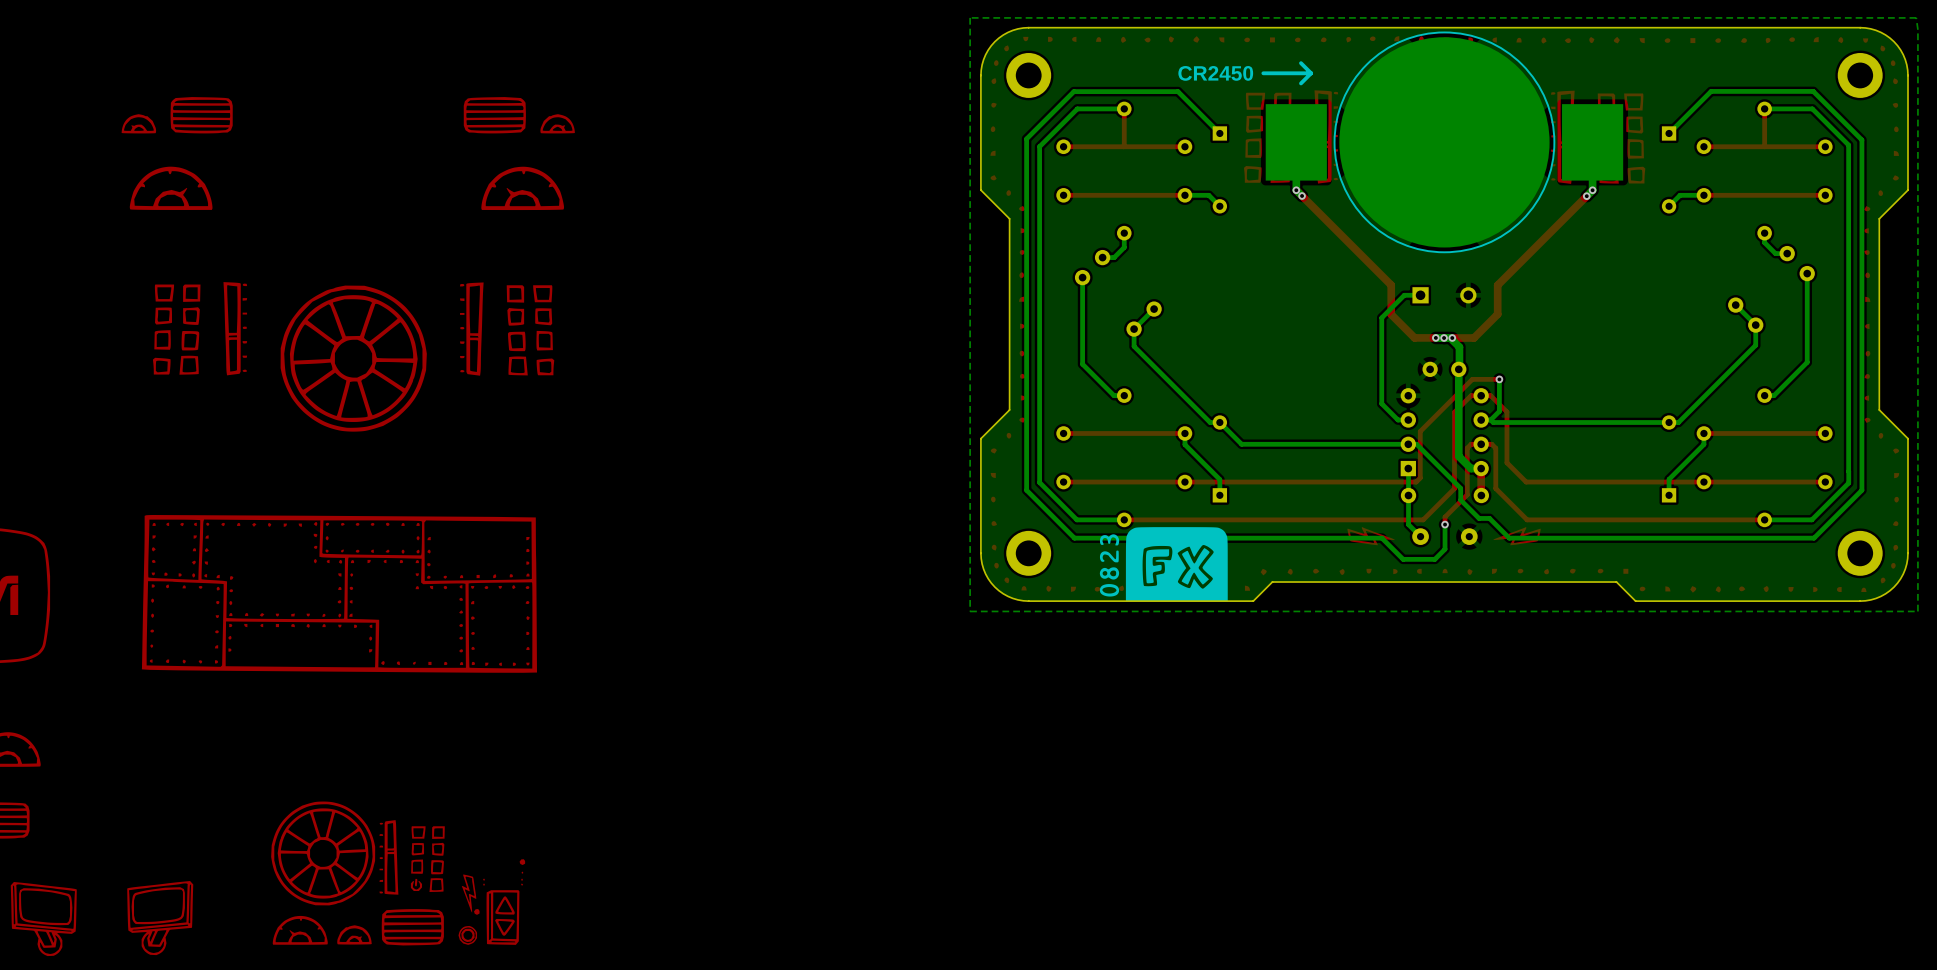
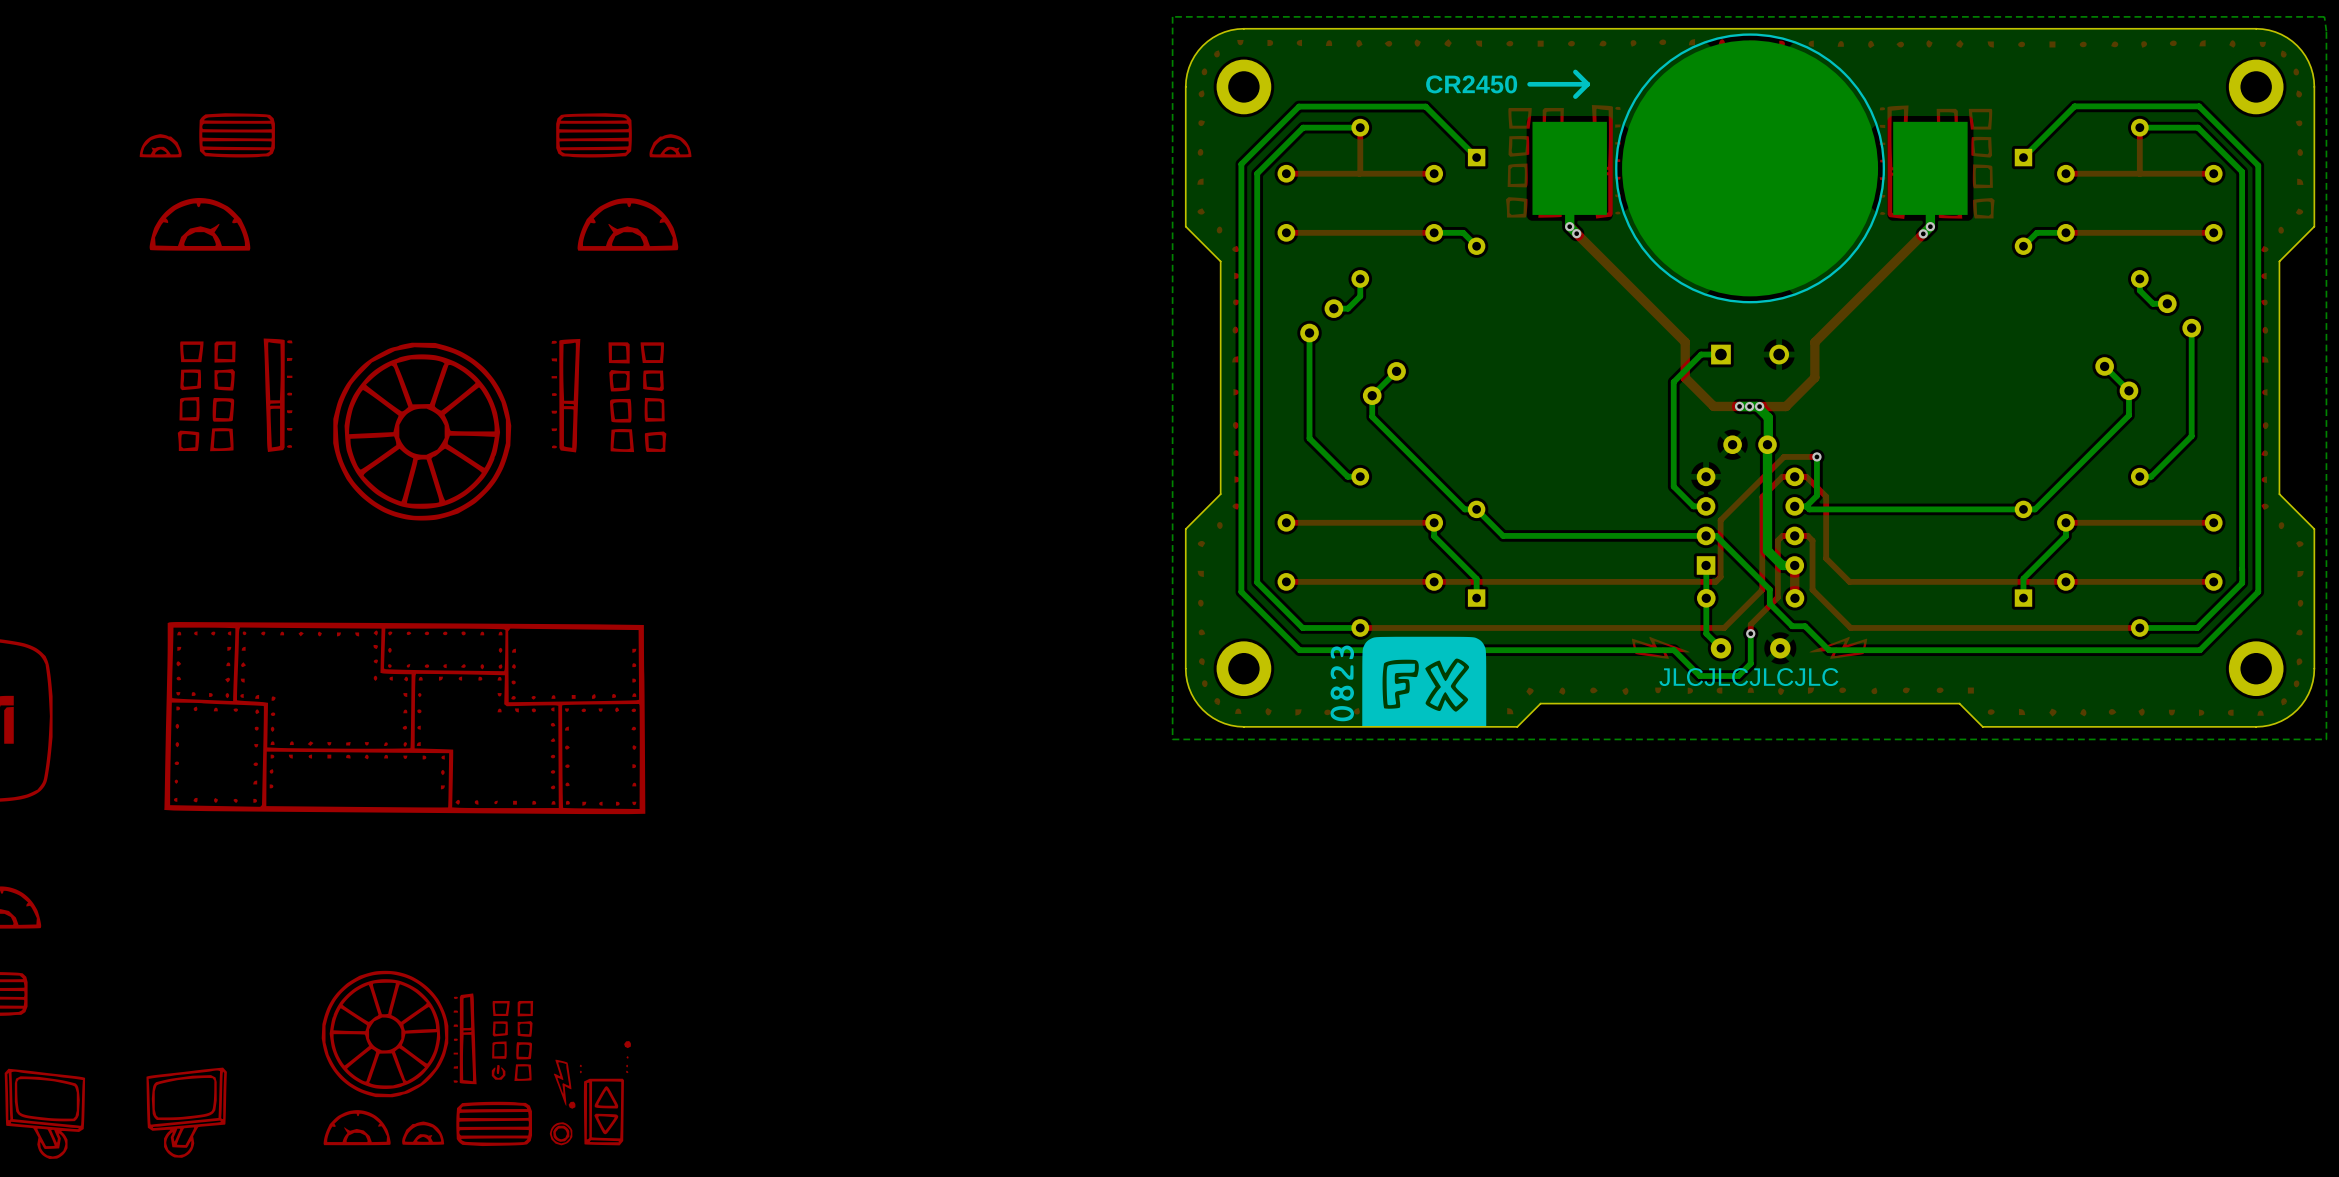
text: none -> JLCJLCJLCJLC (1748, 677)

